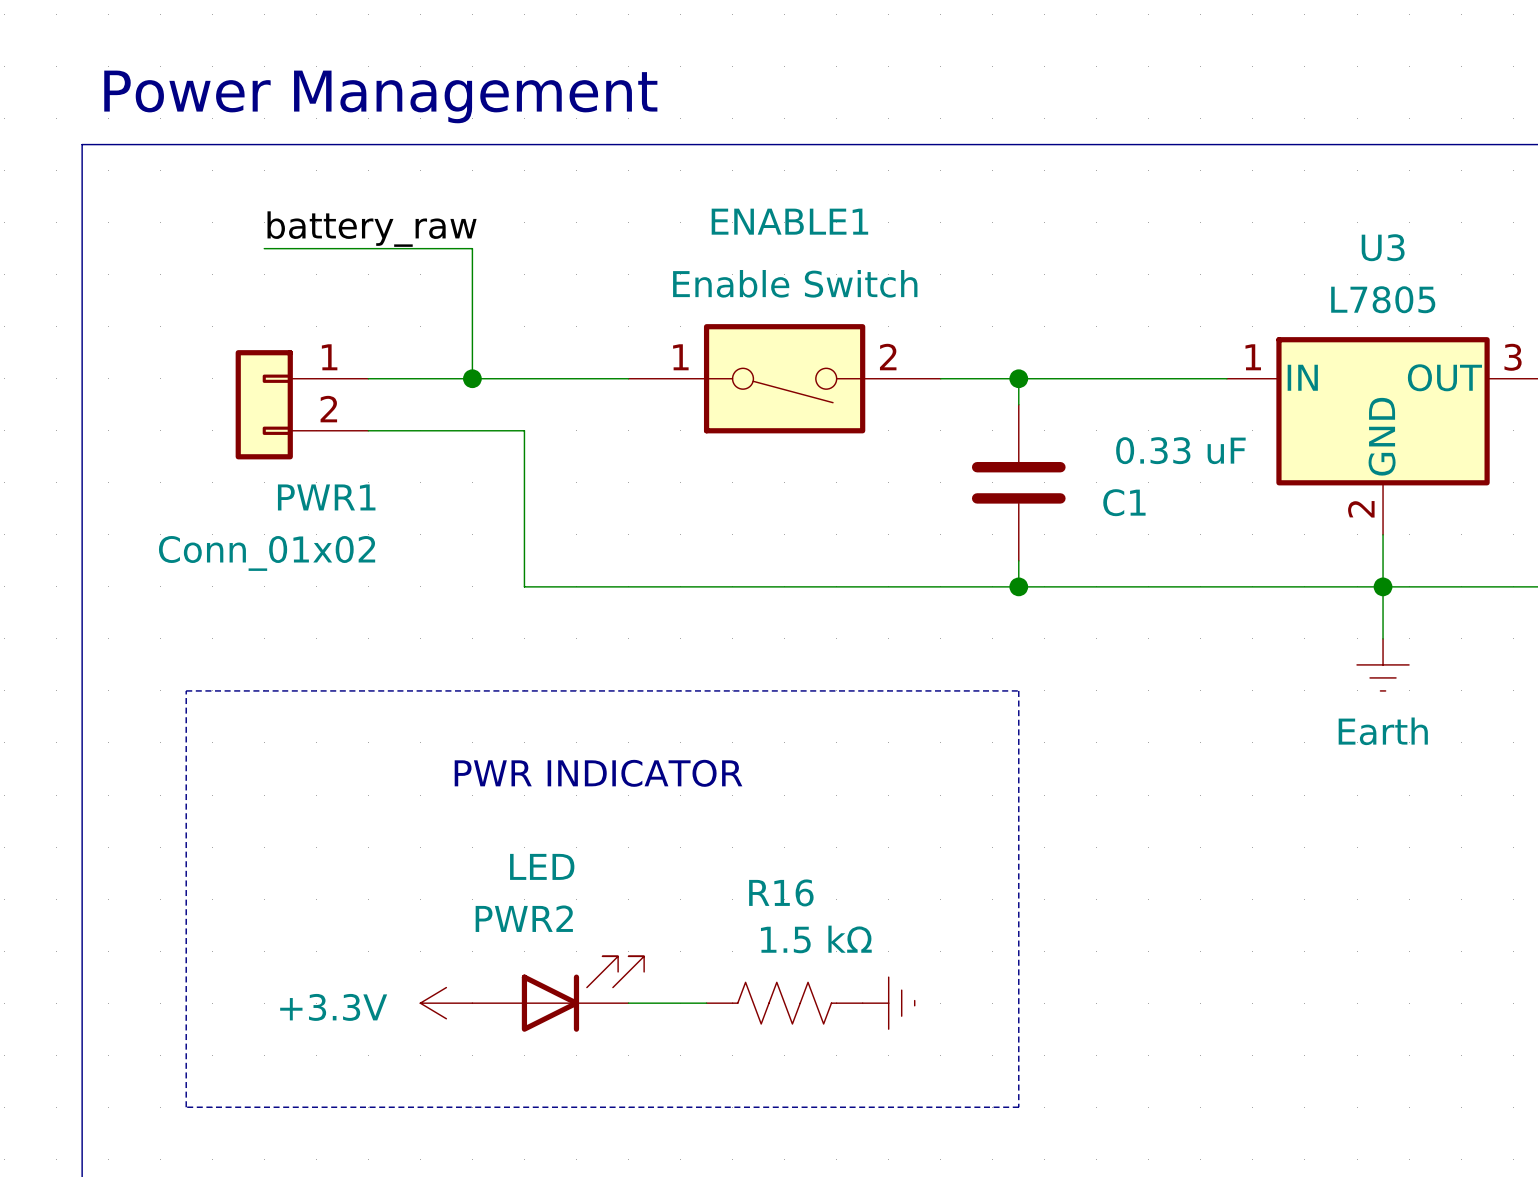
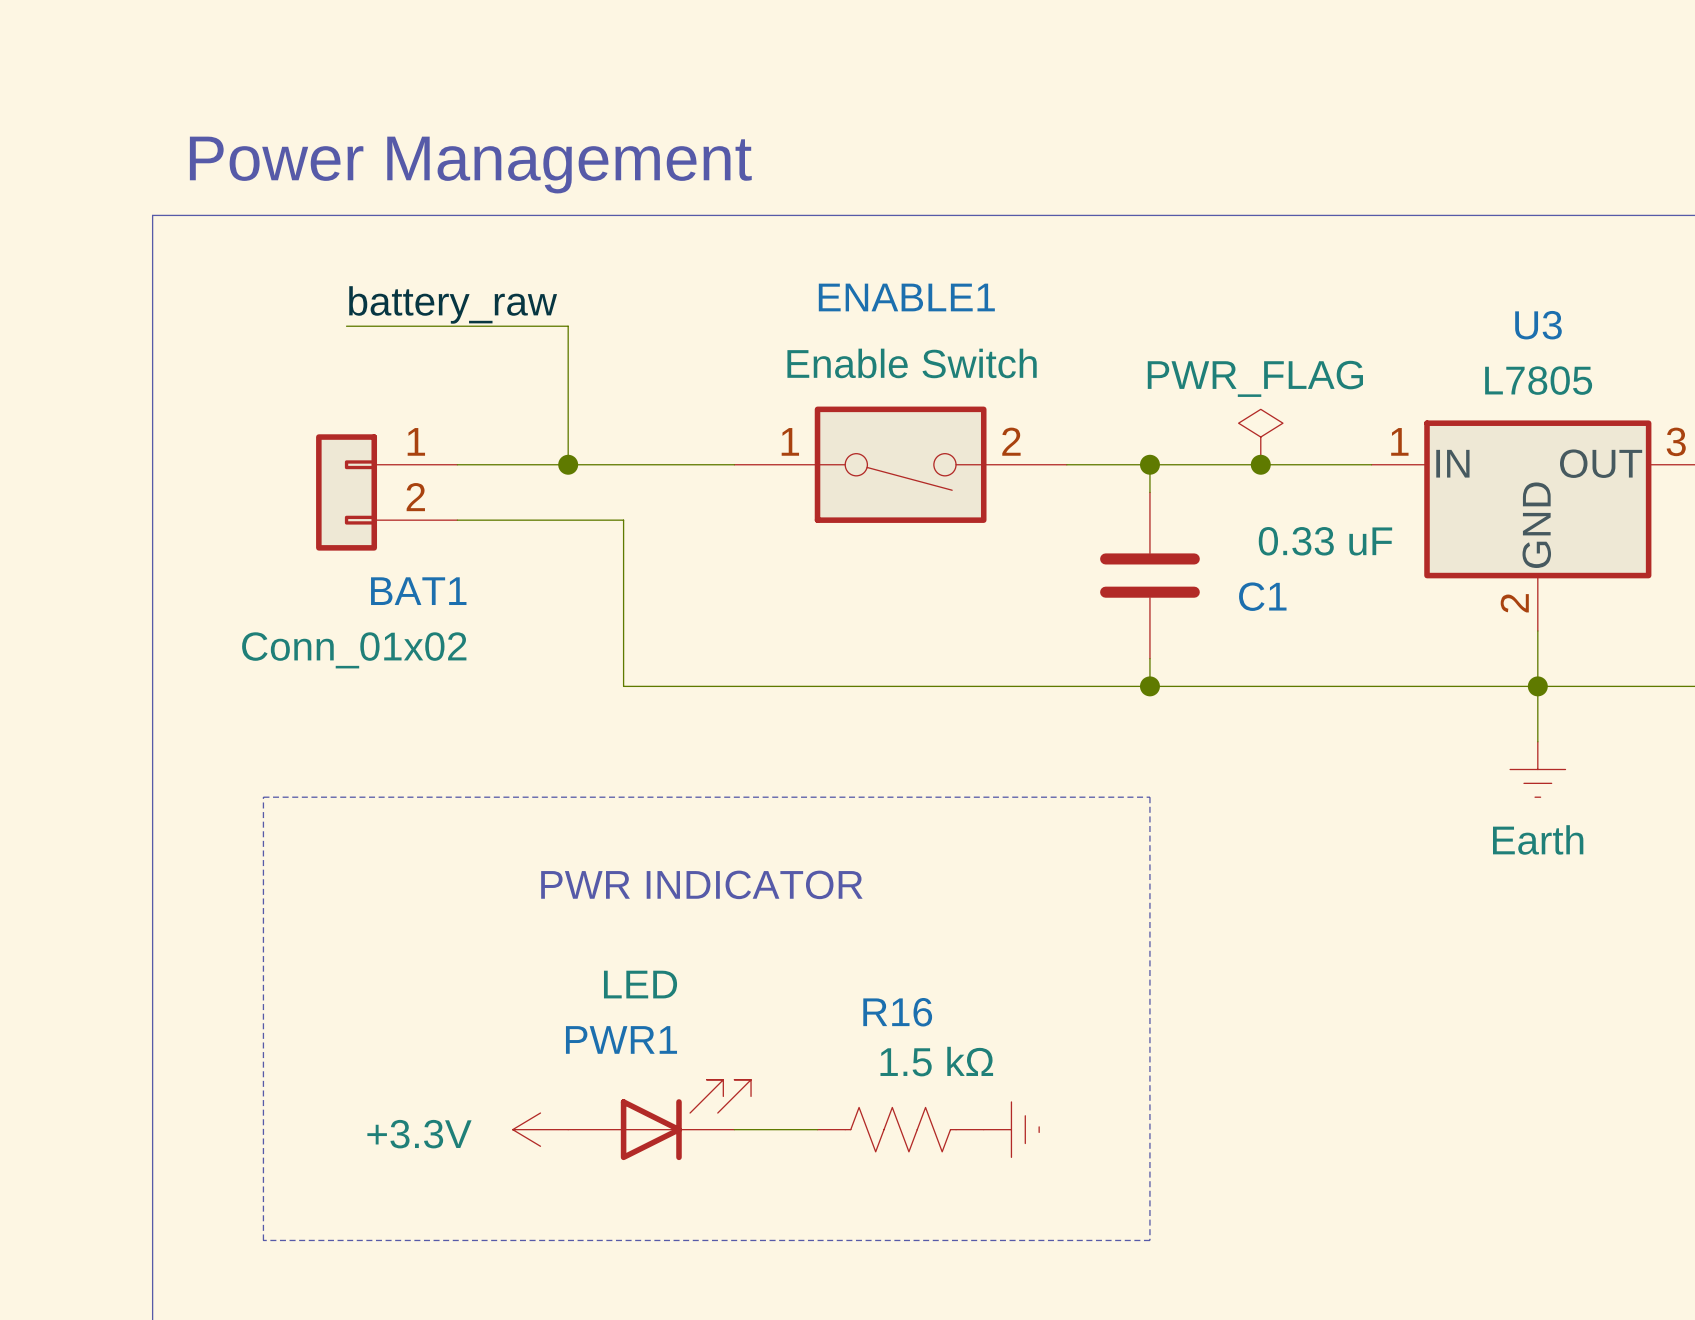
power symbol: none -> PWR_FLAG (1260, 437)
junction: none -> (1260, 464)
PWR1 name: PWR1 (326, 497) -> BAT1 (418, 591)
PWR2 name: PWR2 (524, 918) -> PWR1 (621, 1039)

